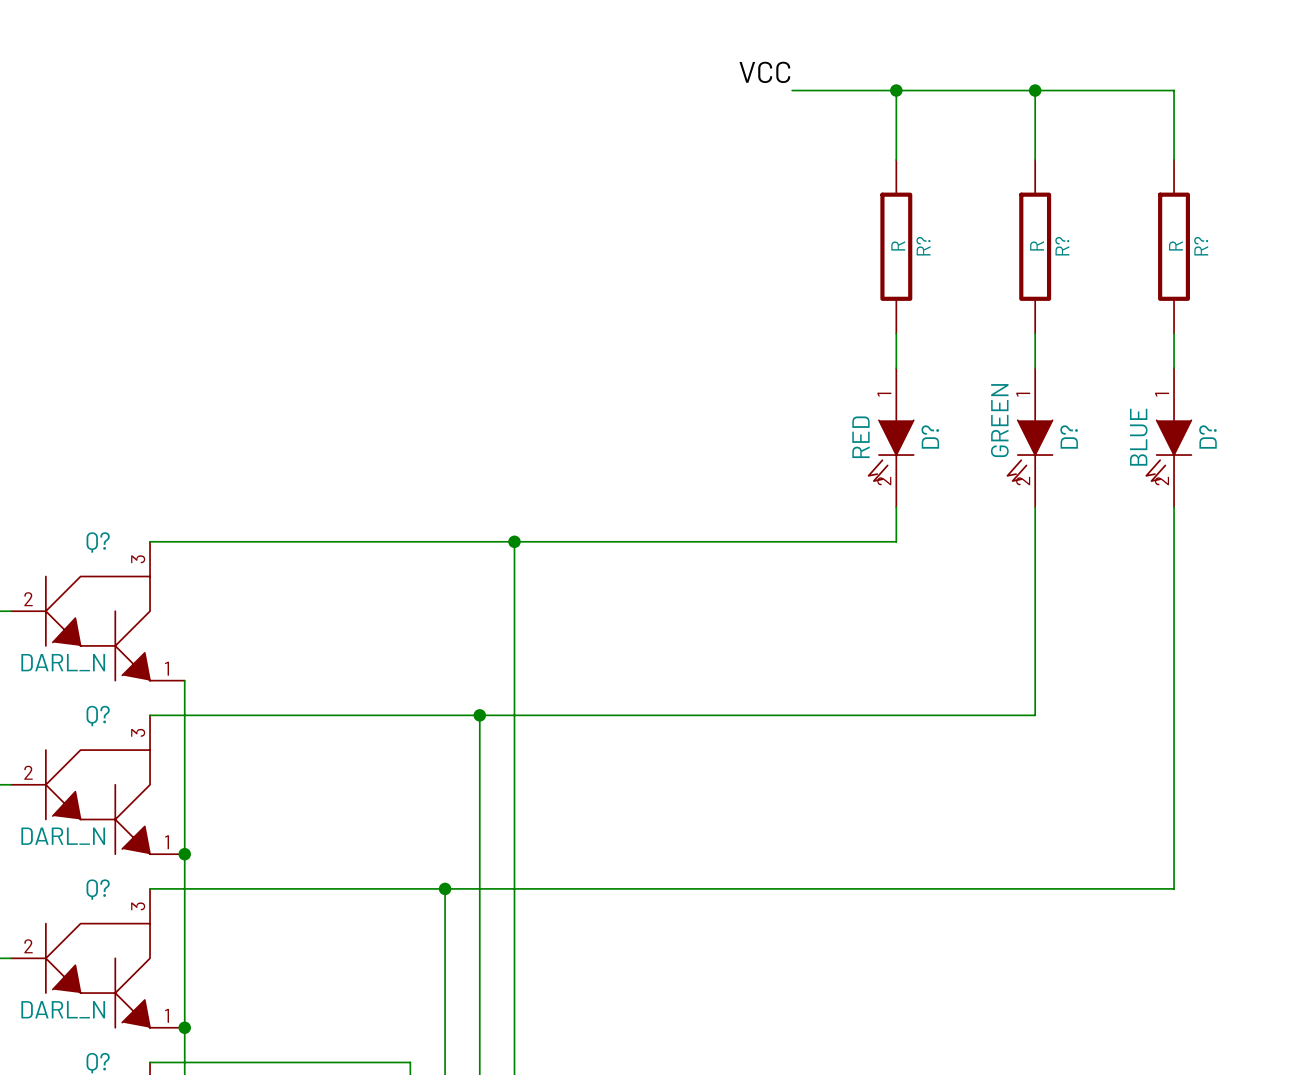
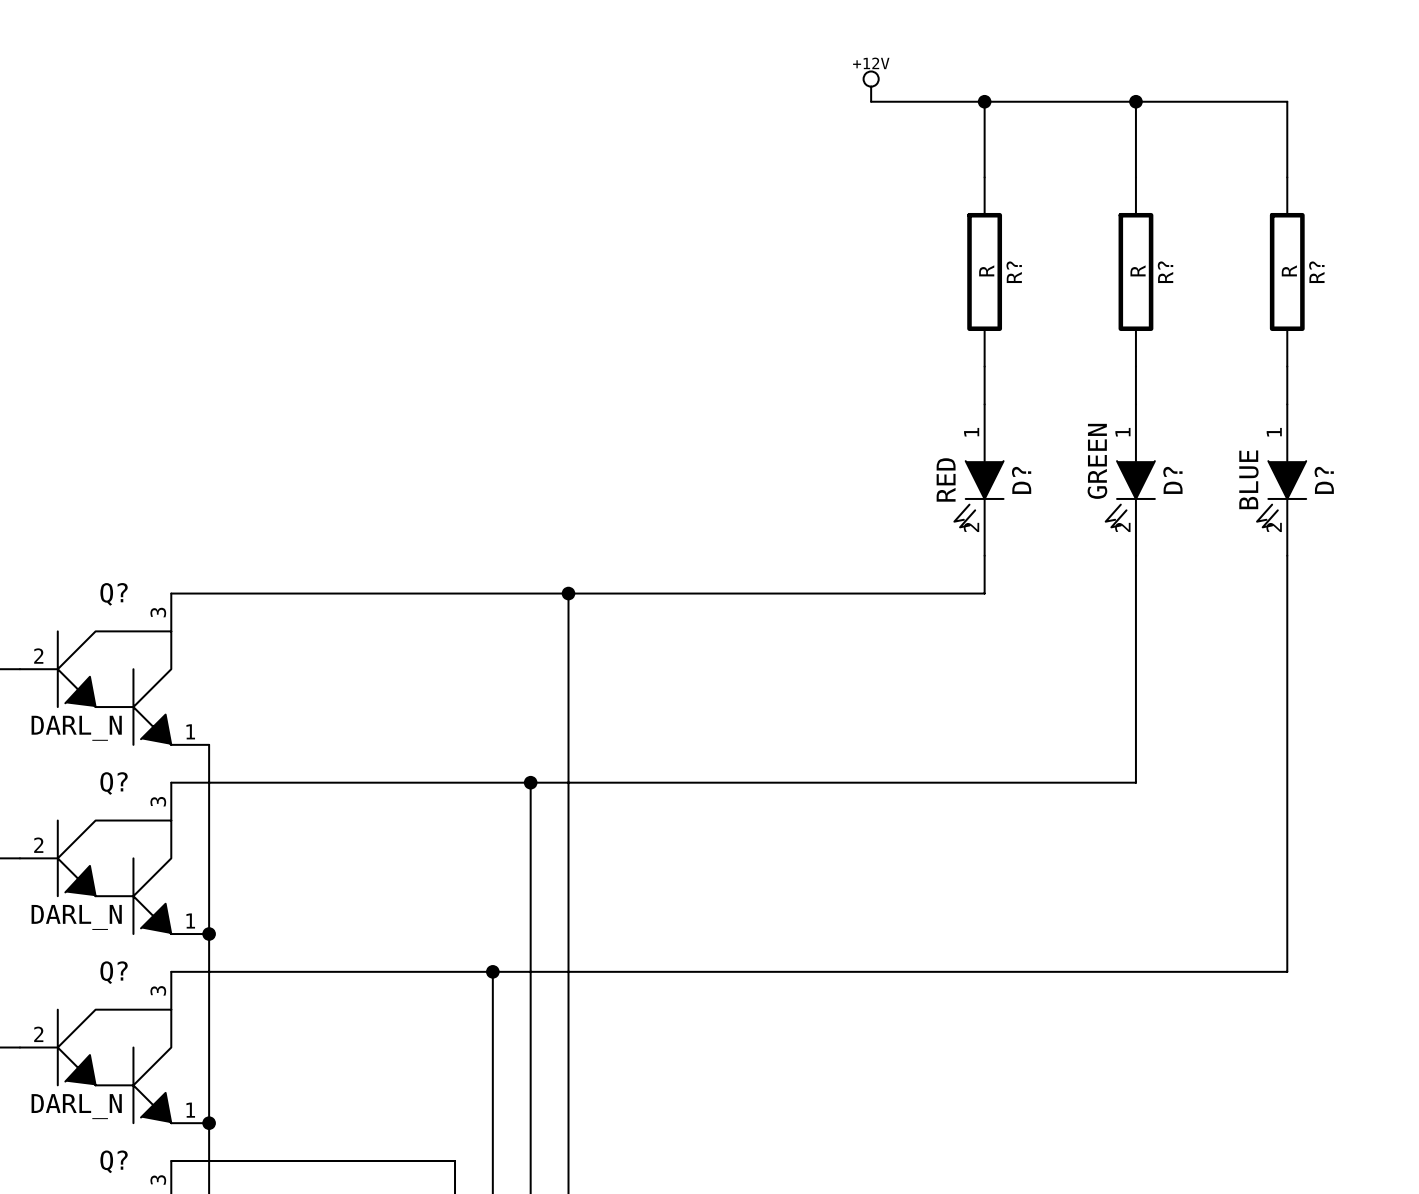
label: VCC (764, 72) -> none
power symbol: none -> +12V (871, 86)

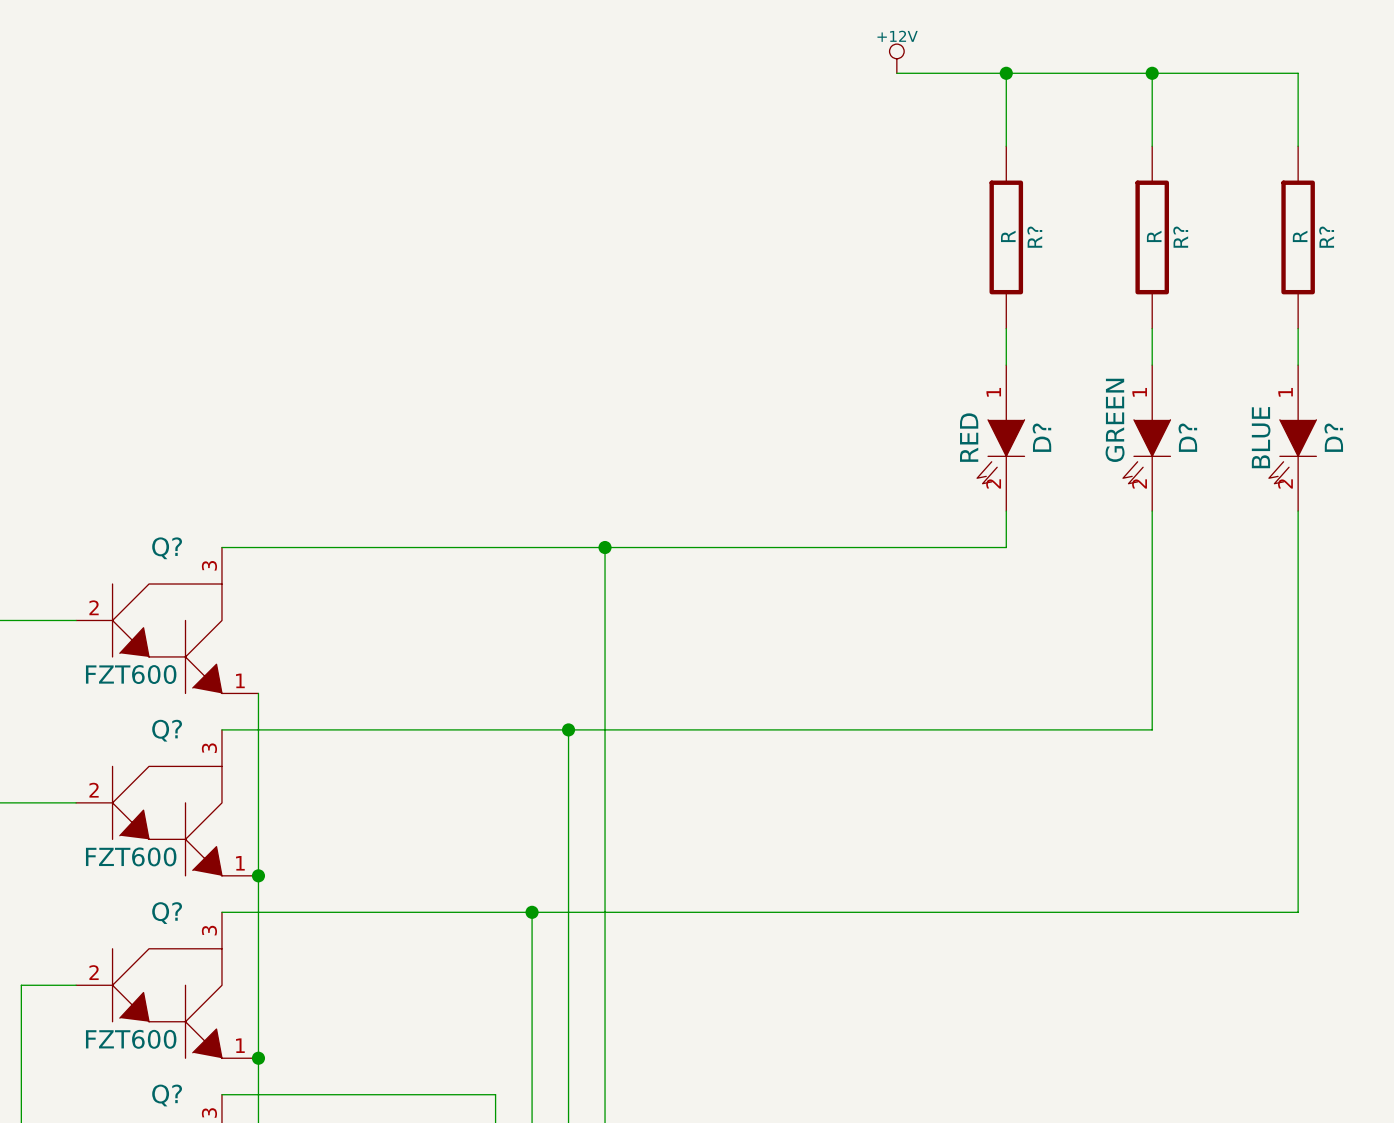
Q? value: DARL_N (76, 728) -> FZT600 (131, 674)
Q? value: DARL_N (76, 917) -> FZT600 (131, 856)
Q? value: DARL_N (76, 1106) -> FZT600 (131, 1039)

